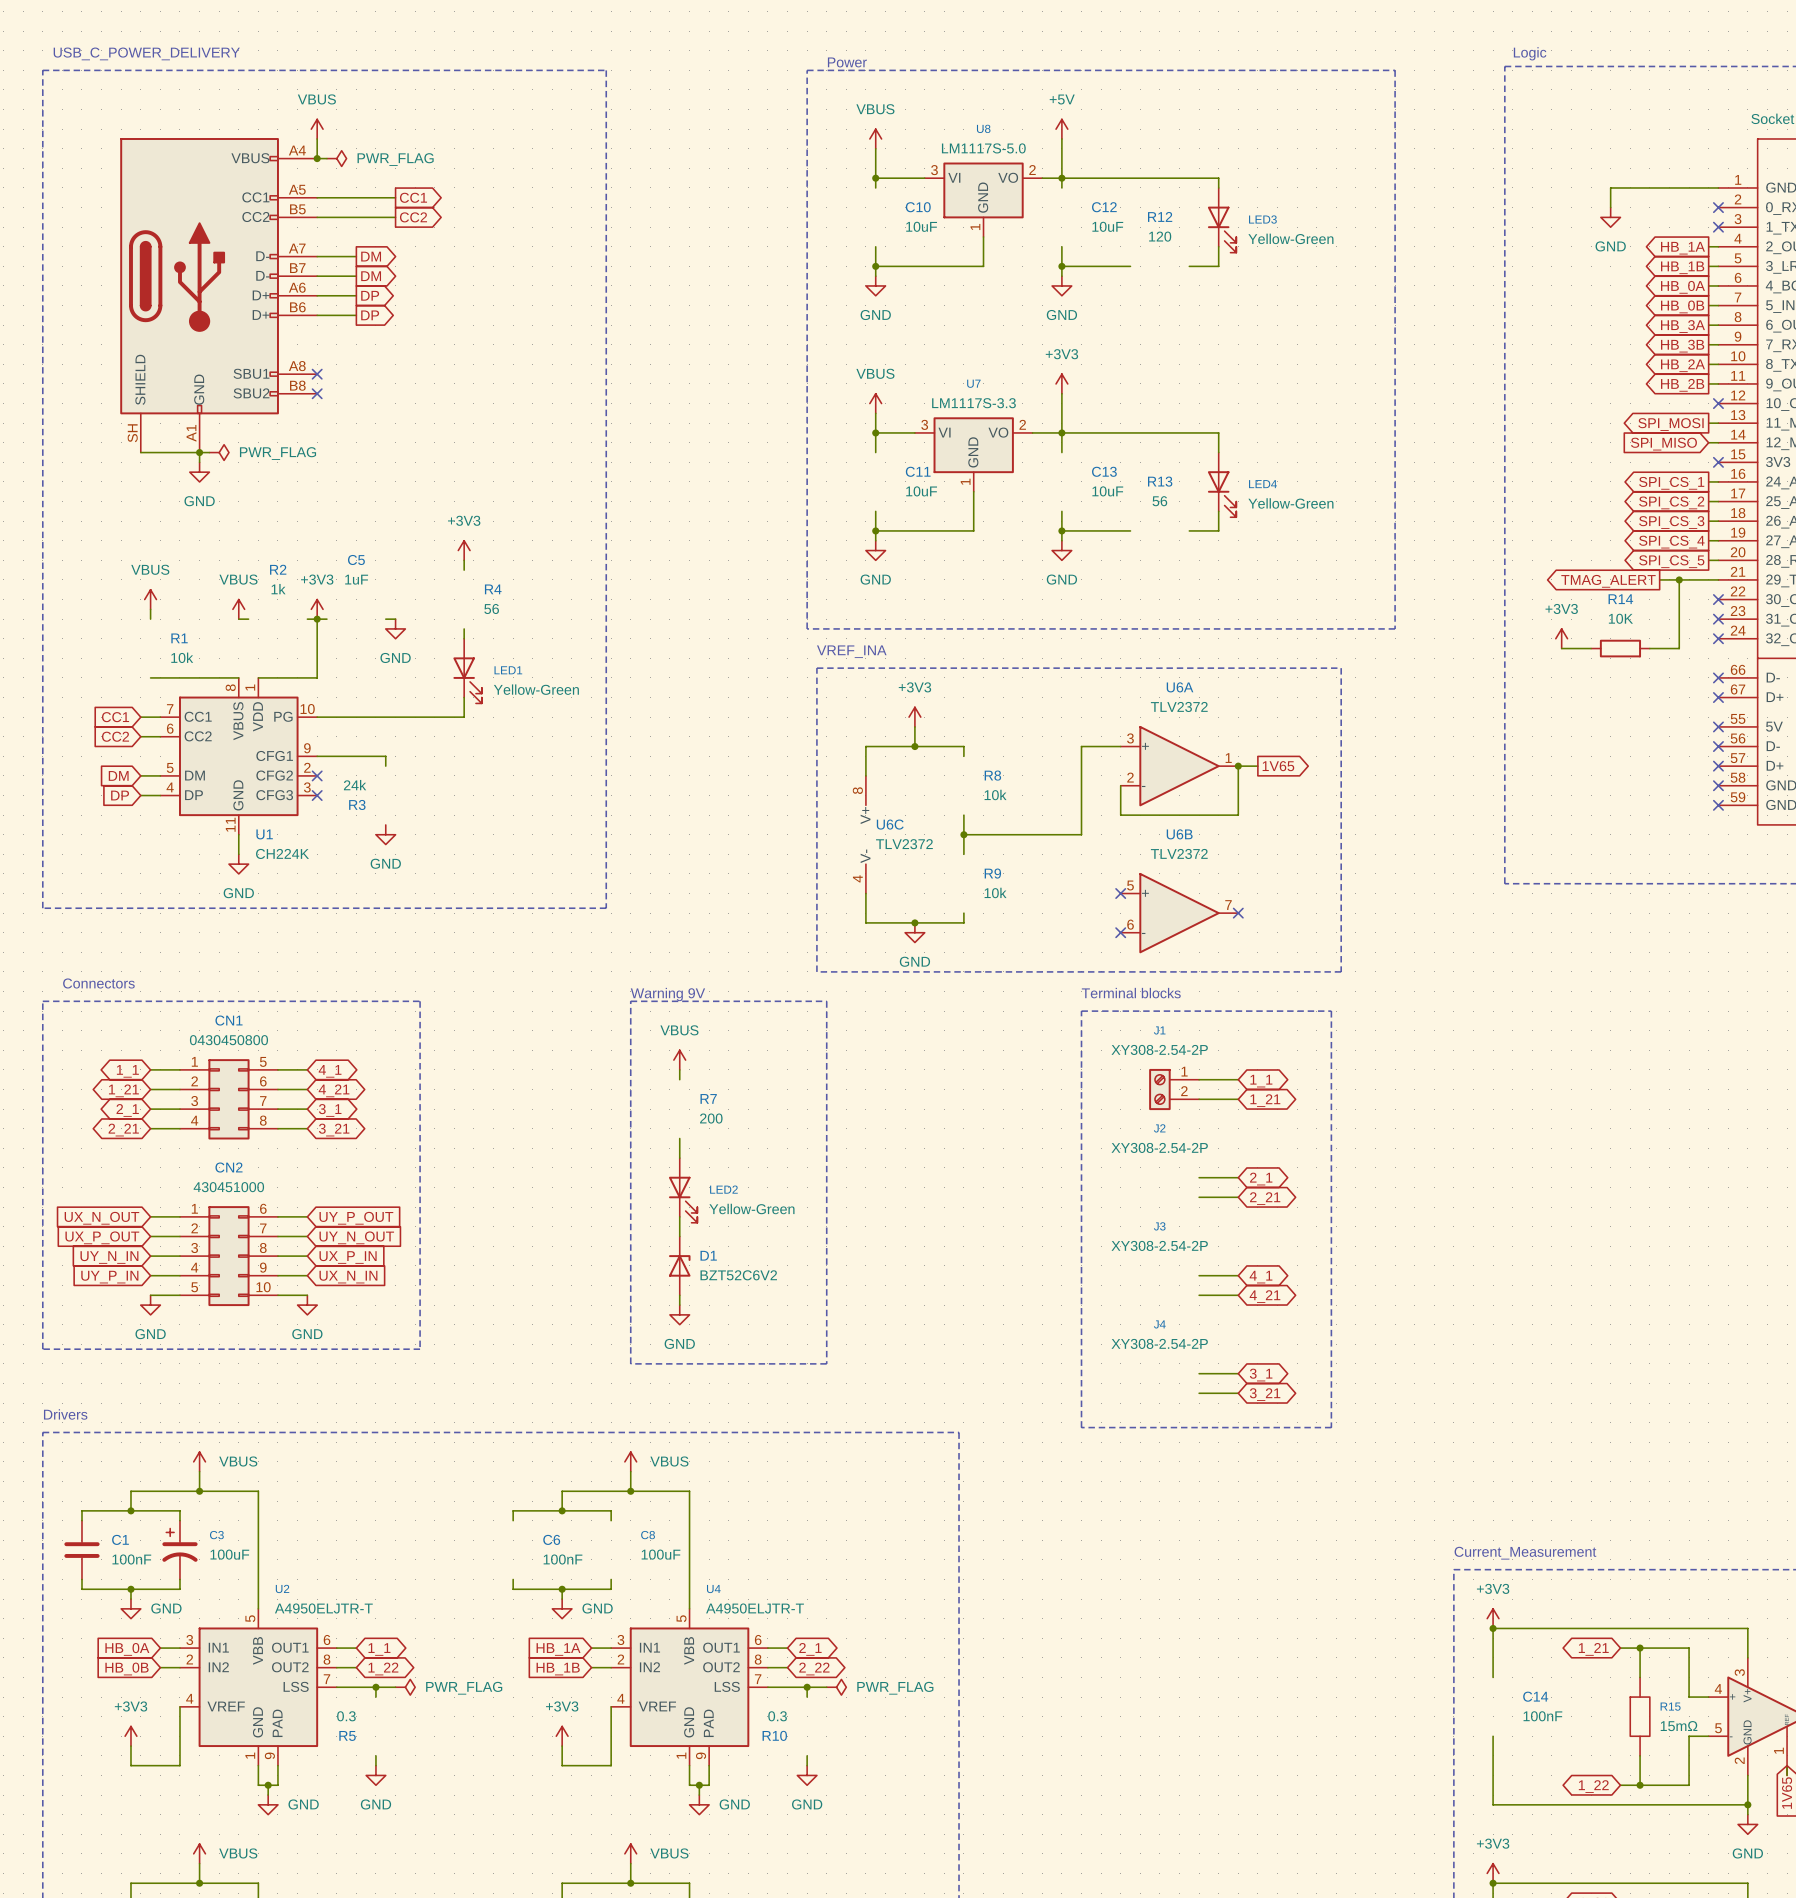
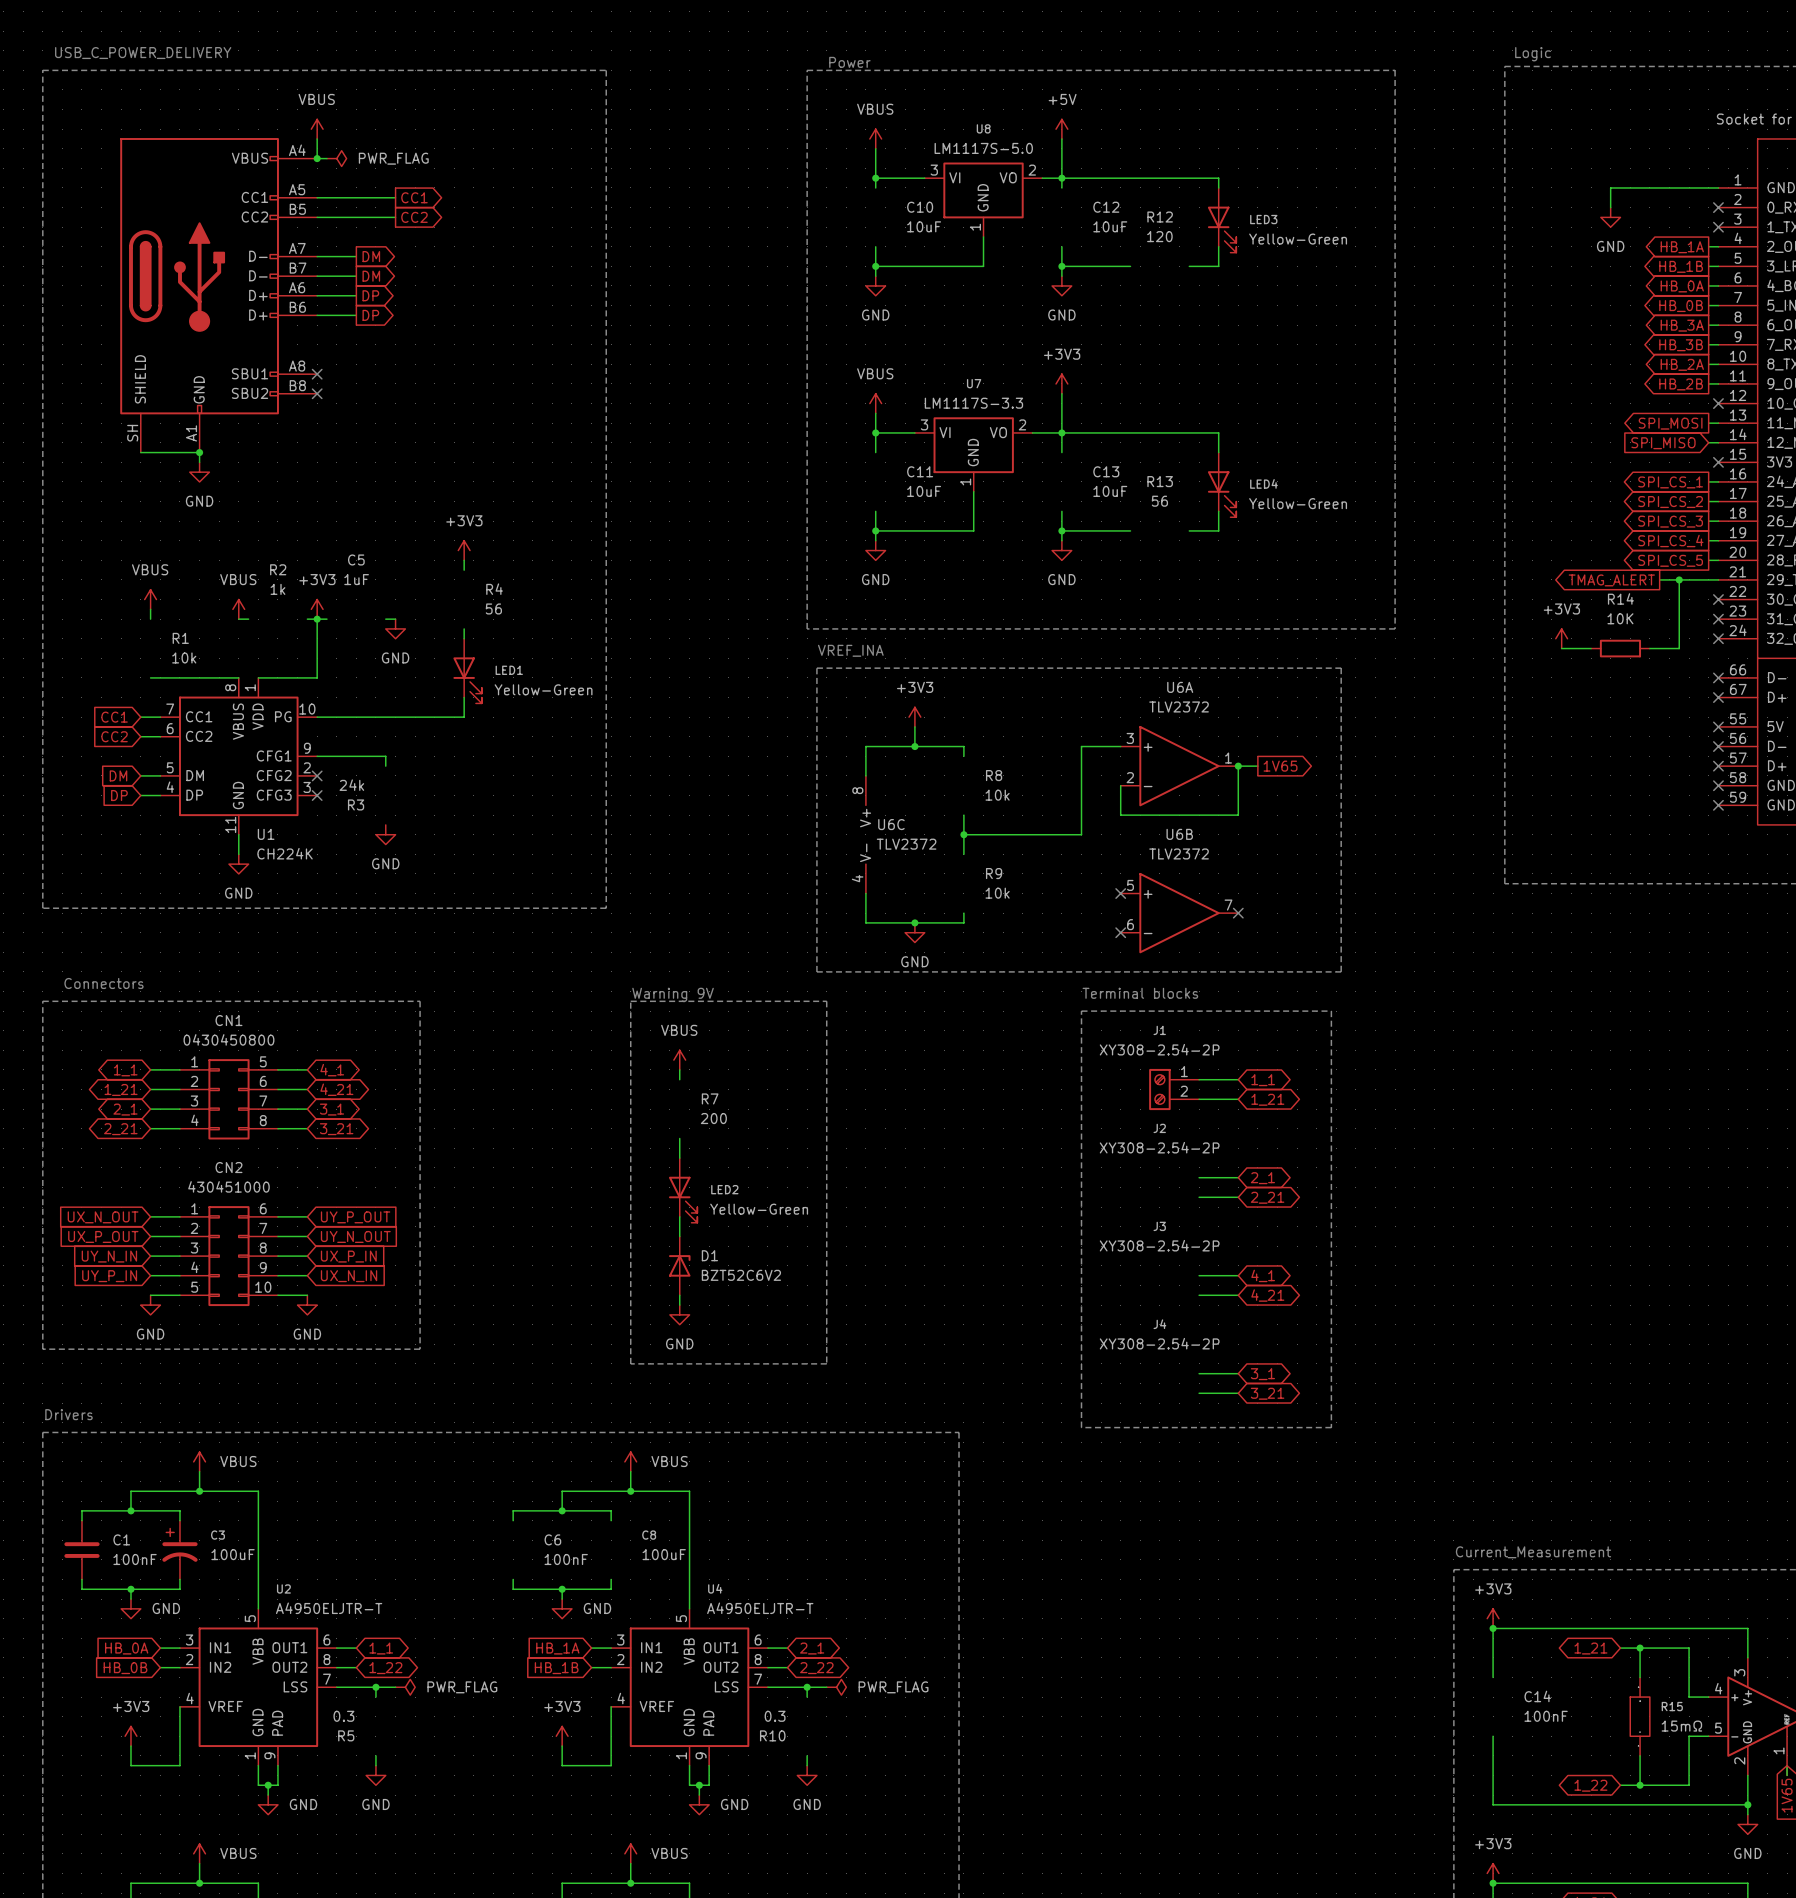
wire: (199, 452) (209, 452) -> none
power symbol: PWR_FLAG (219, 452) -> none

